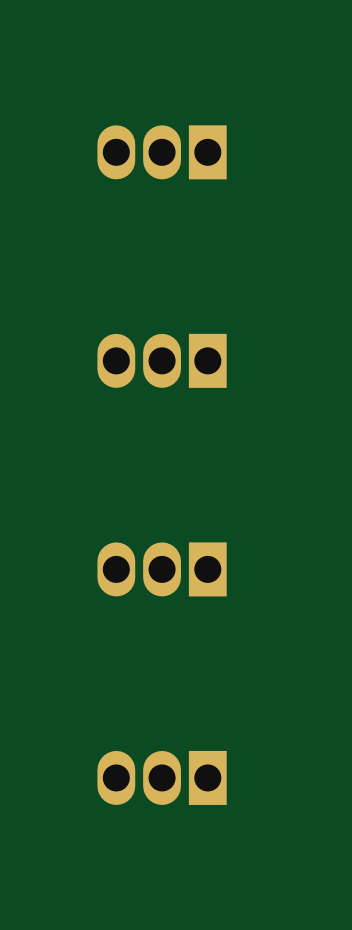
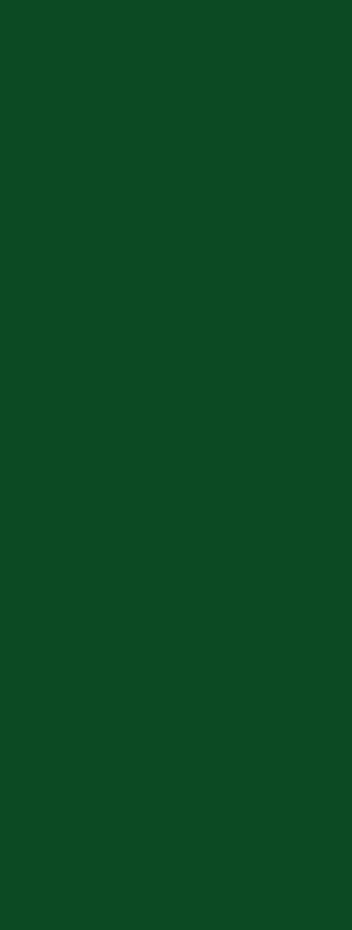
part: (162, 152) -> none
part: (162, 360) -> none
part: (162, 569) -> none
part: (162, 777) -> none

